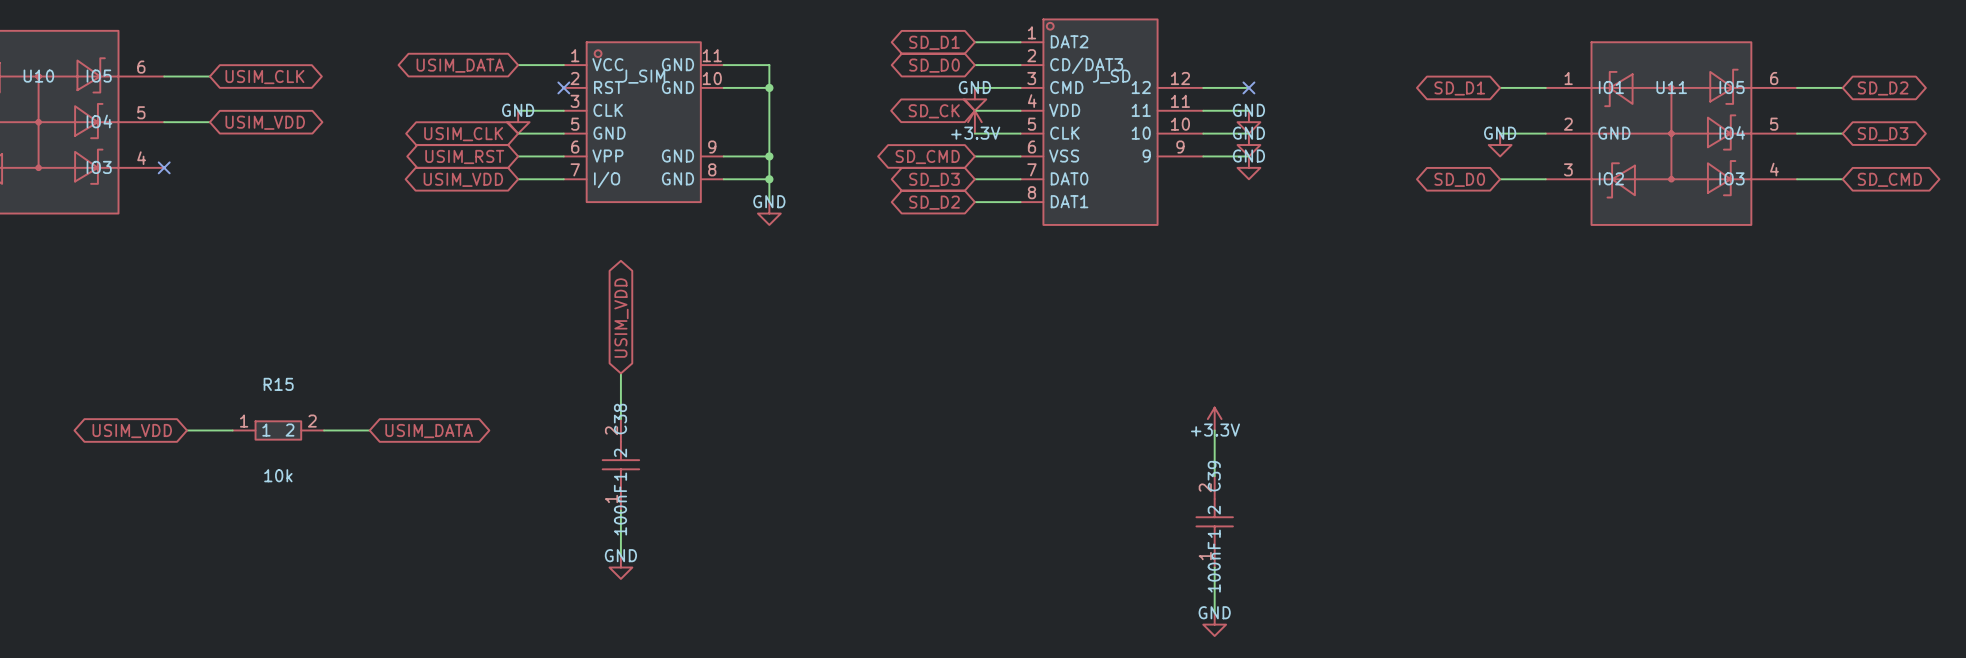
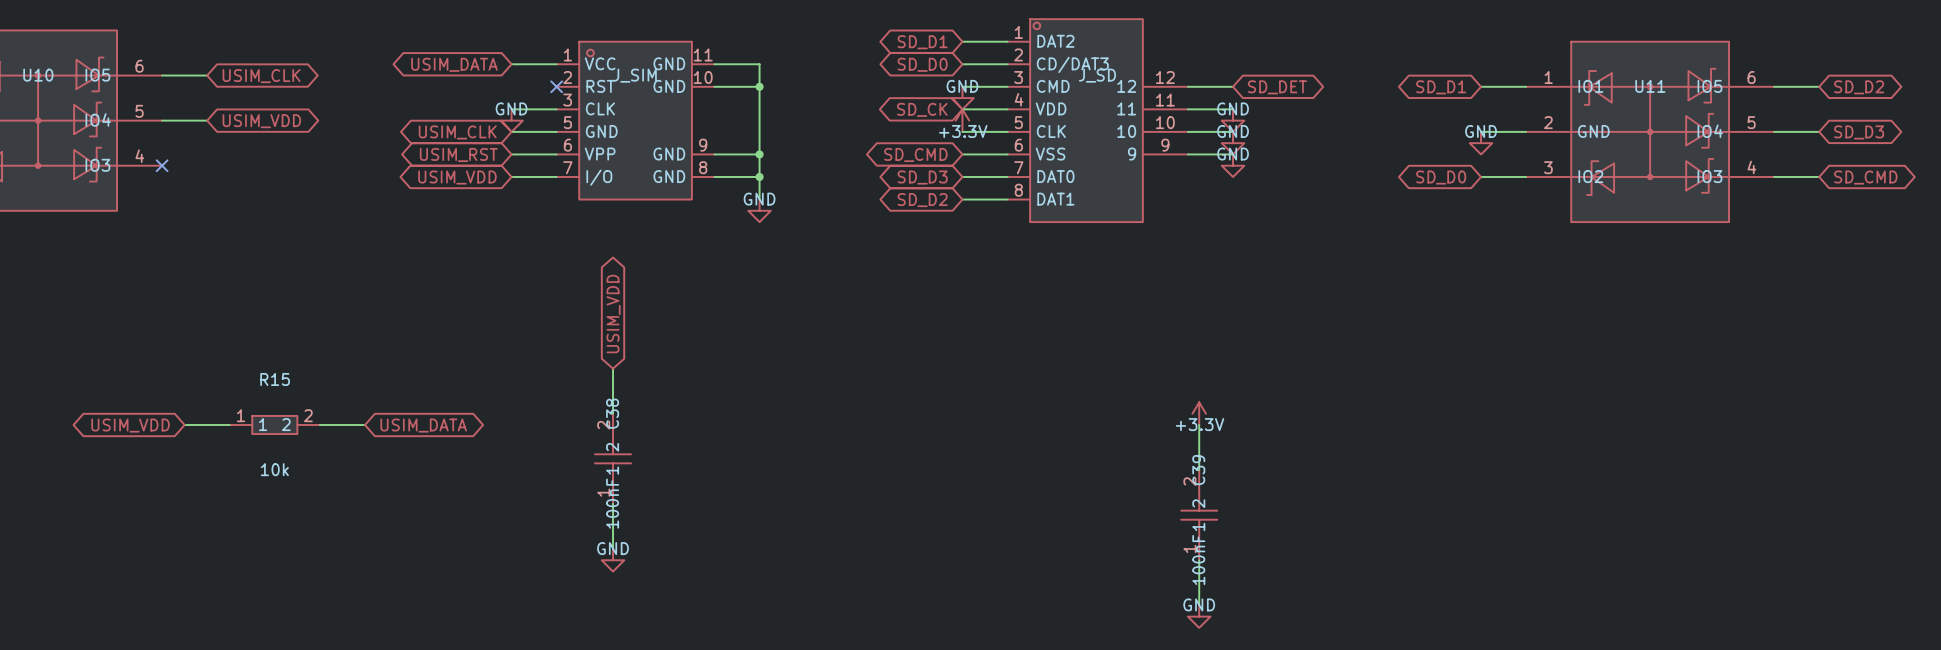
no-connect mark: (1248, 87) -> none
global label: none -> SD_DET (1277, 87)

